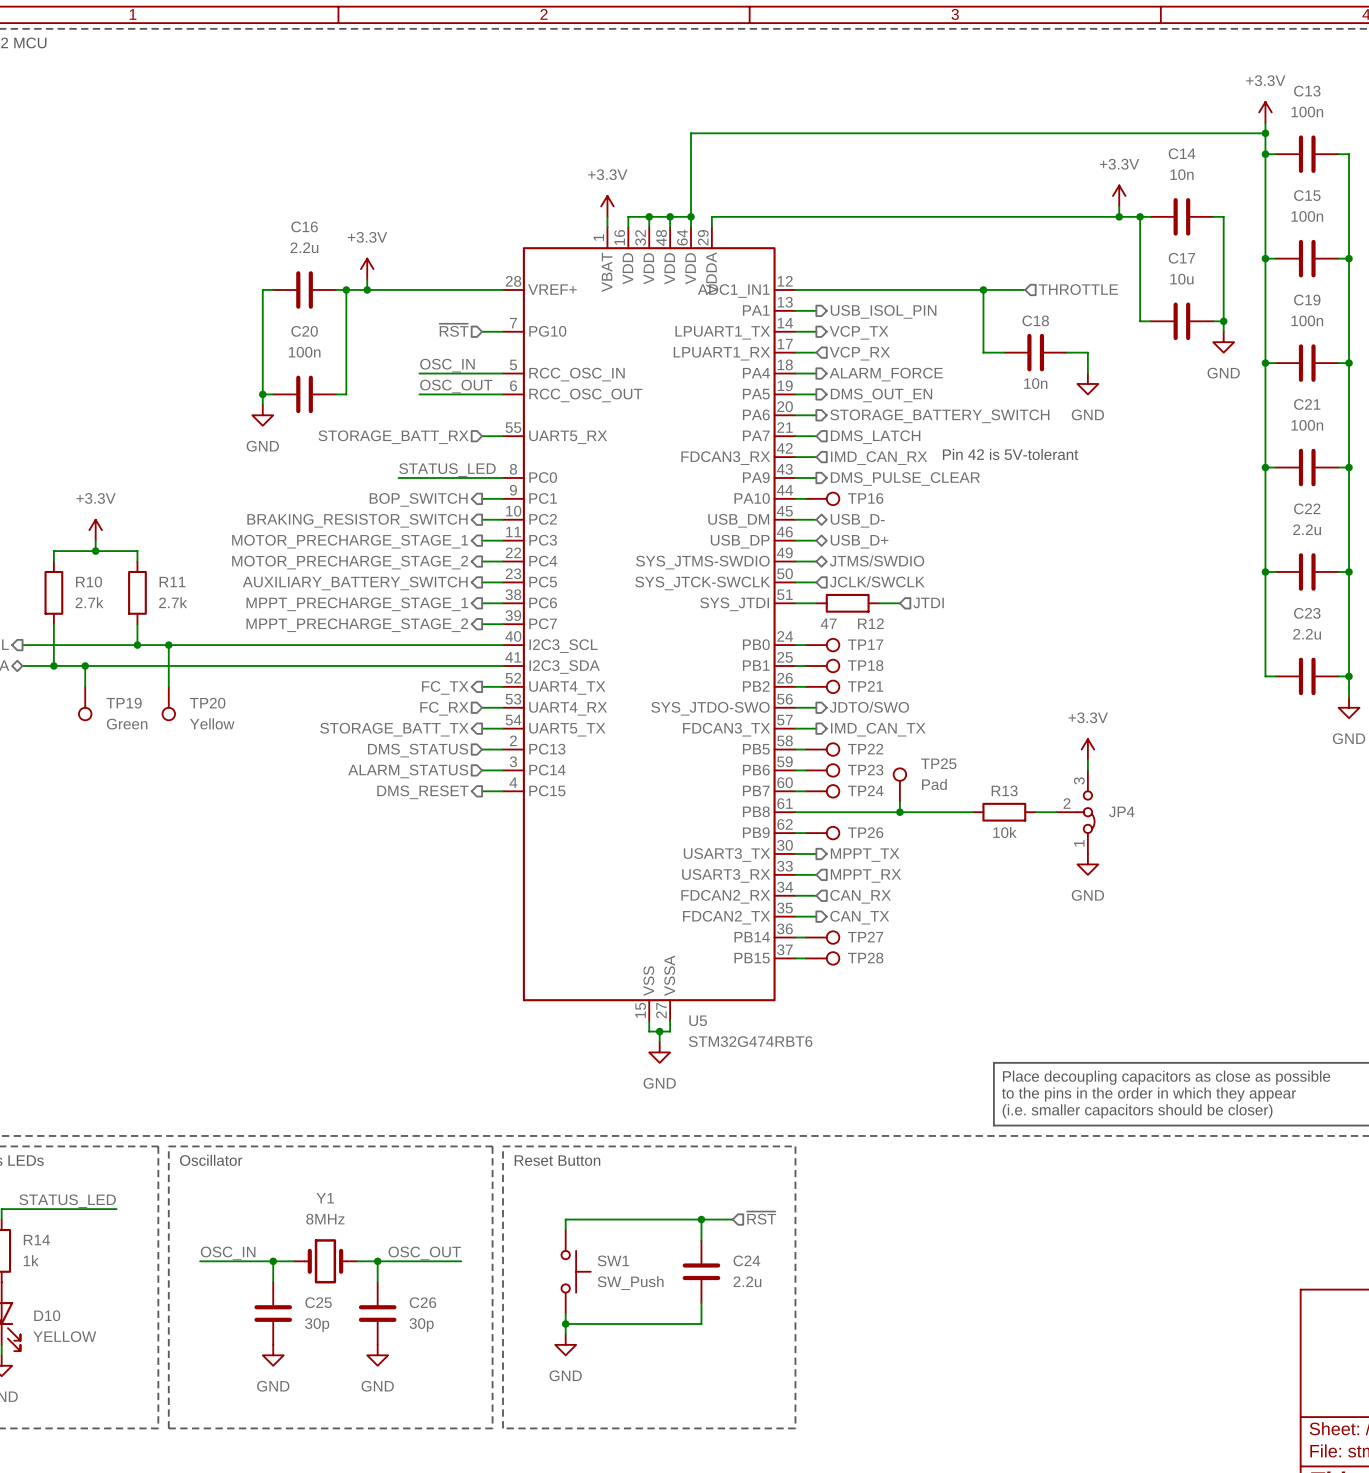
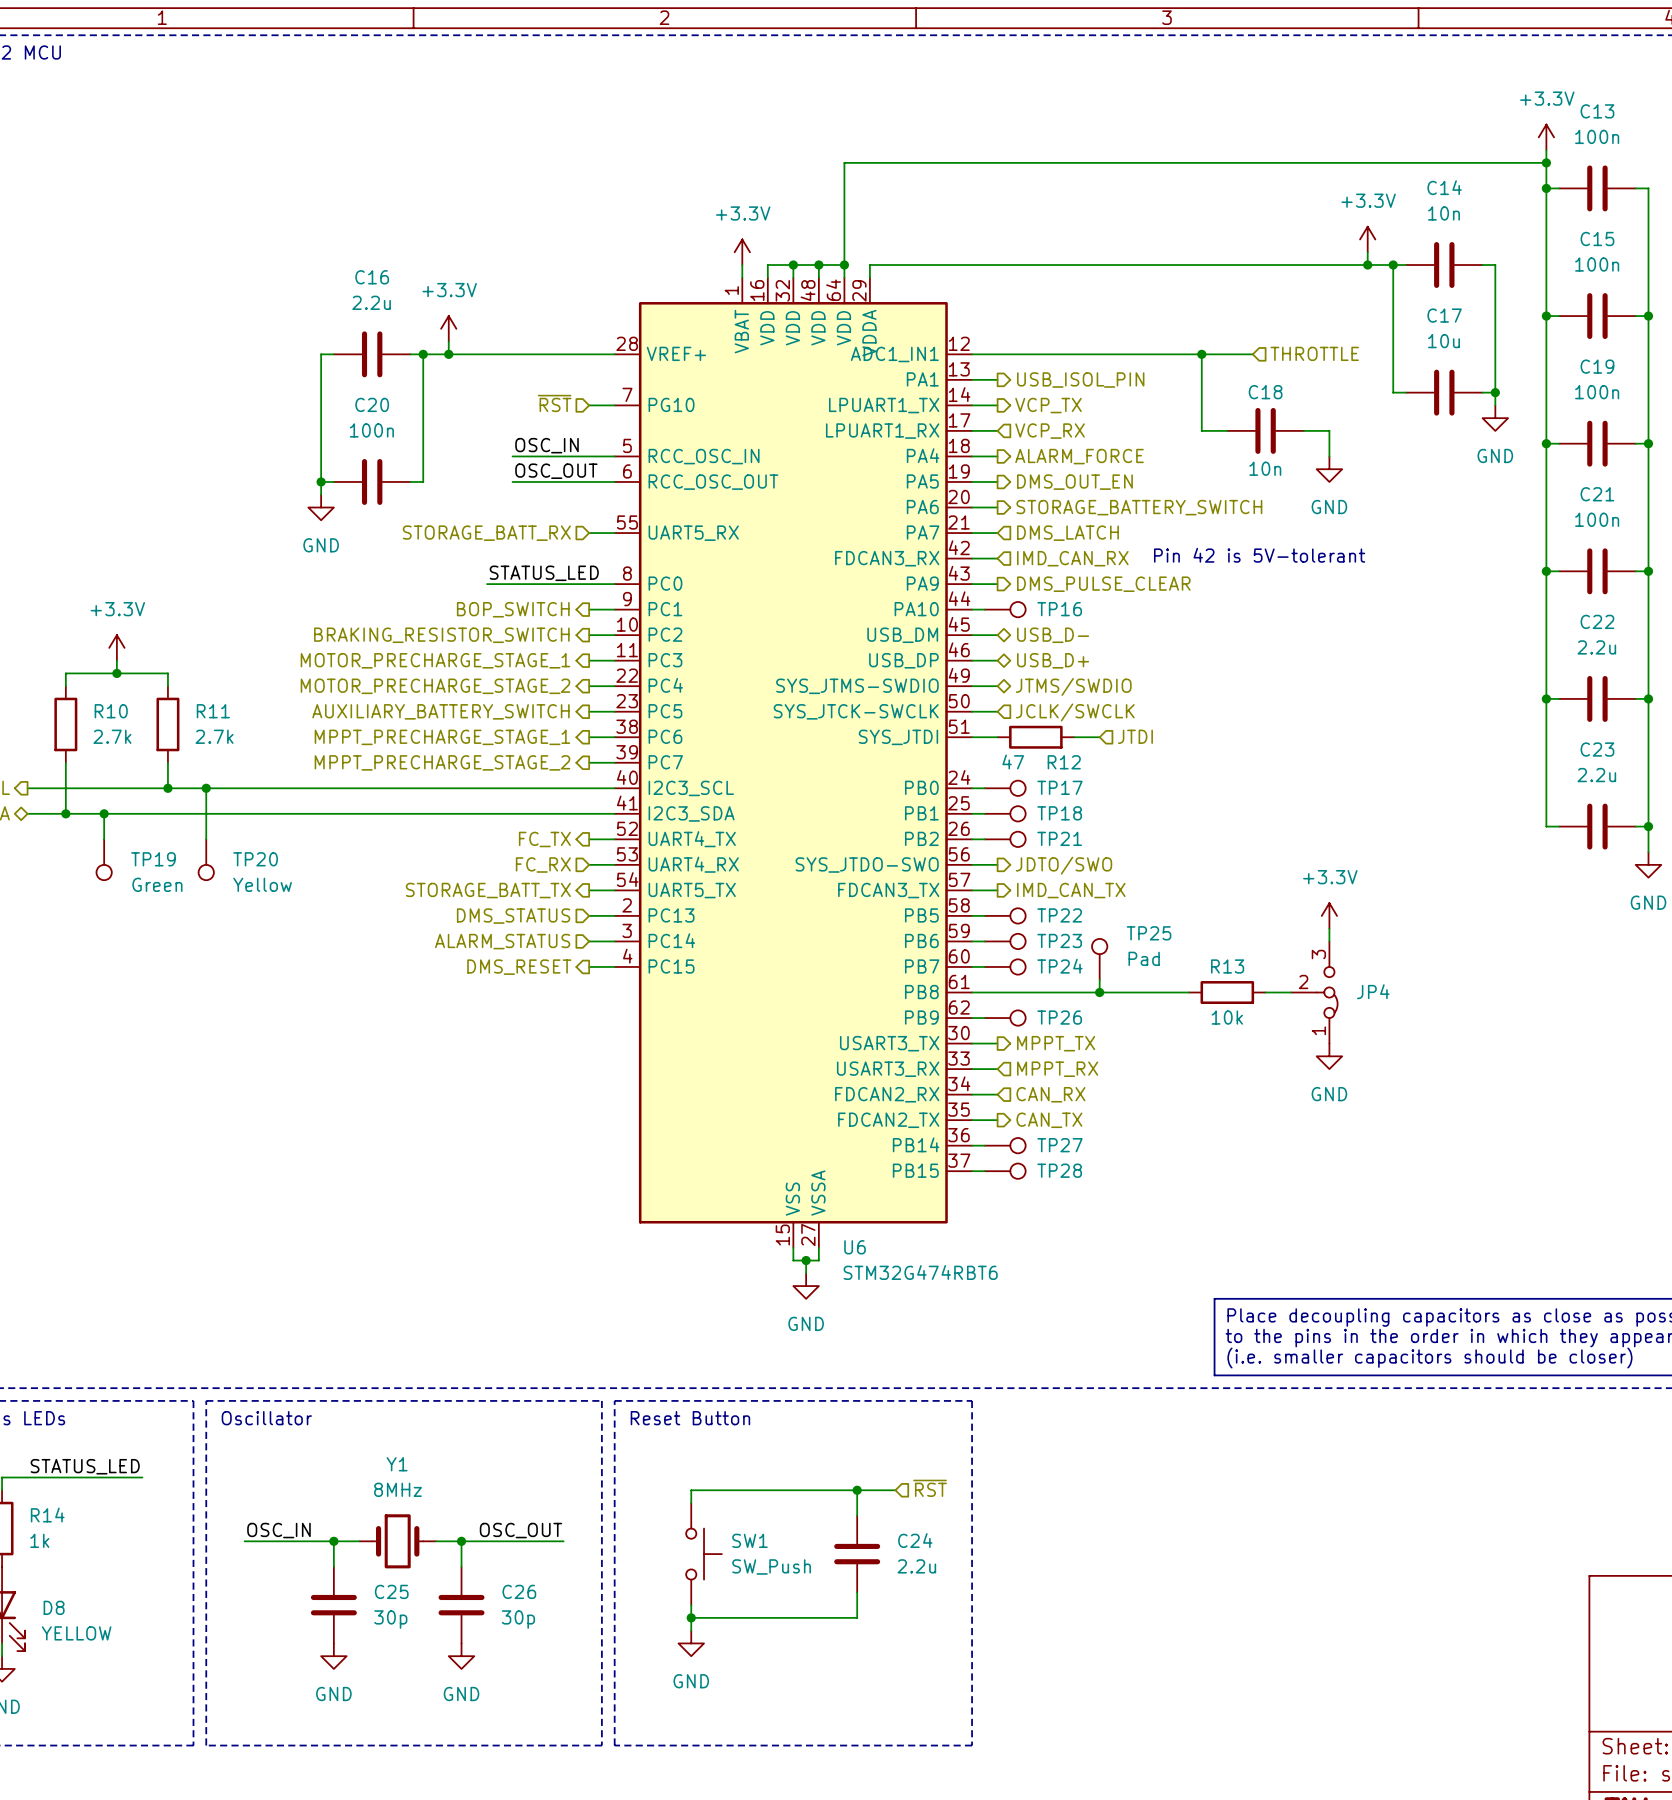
U5 name: U5 (698, 1020) -> U6 (855, 1247)
D10 name: D10 (47, 1315) -> D8 (54, 1607)

